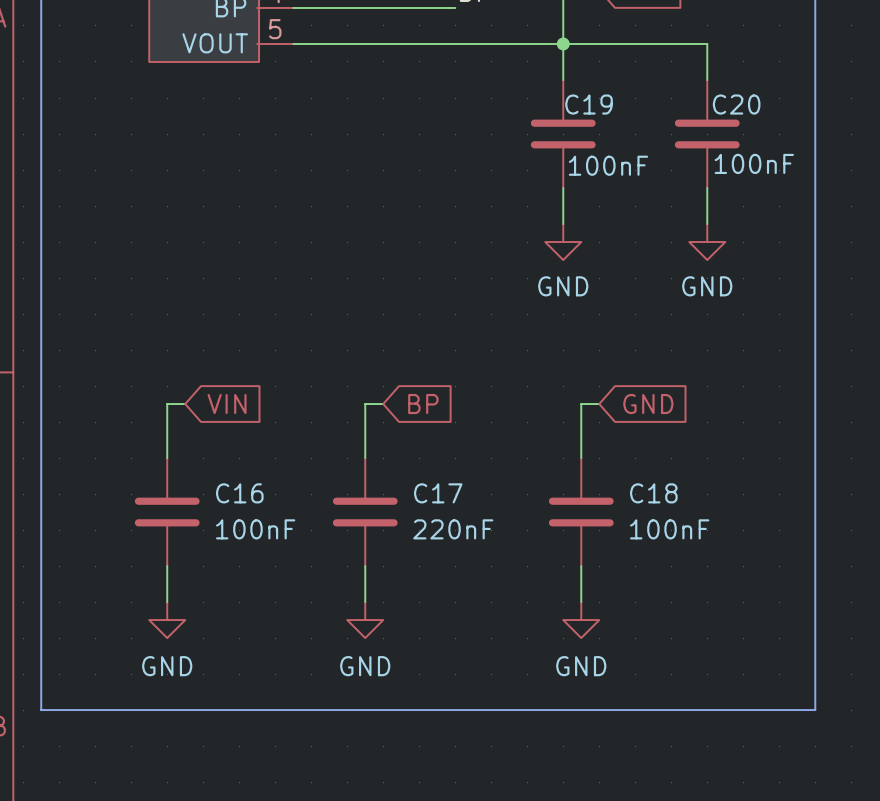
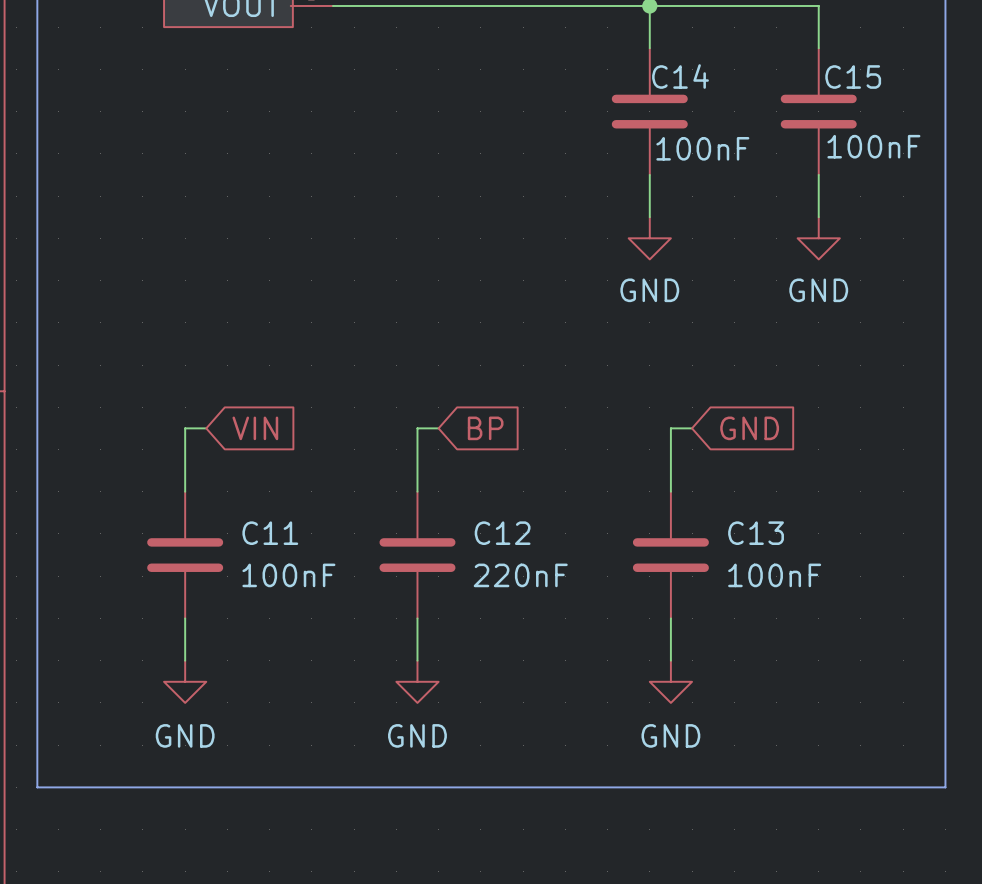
C19 name: C19 (589, 104) -> C14 (680, 76)
C20 name: C20 (736, 104) -> C15 (853, 77)
C16 name: C16 (239, 493) -> C11 (270, 533)
C17 name: C17 (438, 493) -> C12 (502, 533)
C18 name: C18 (653, 493) -> C13 (756, 533)

